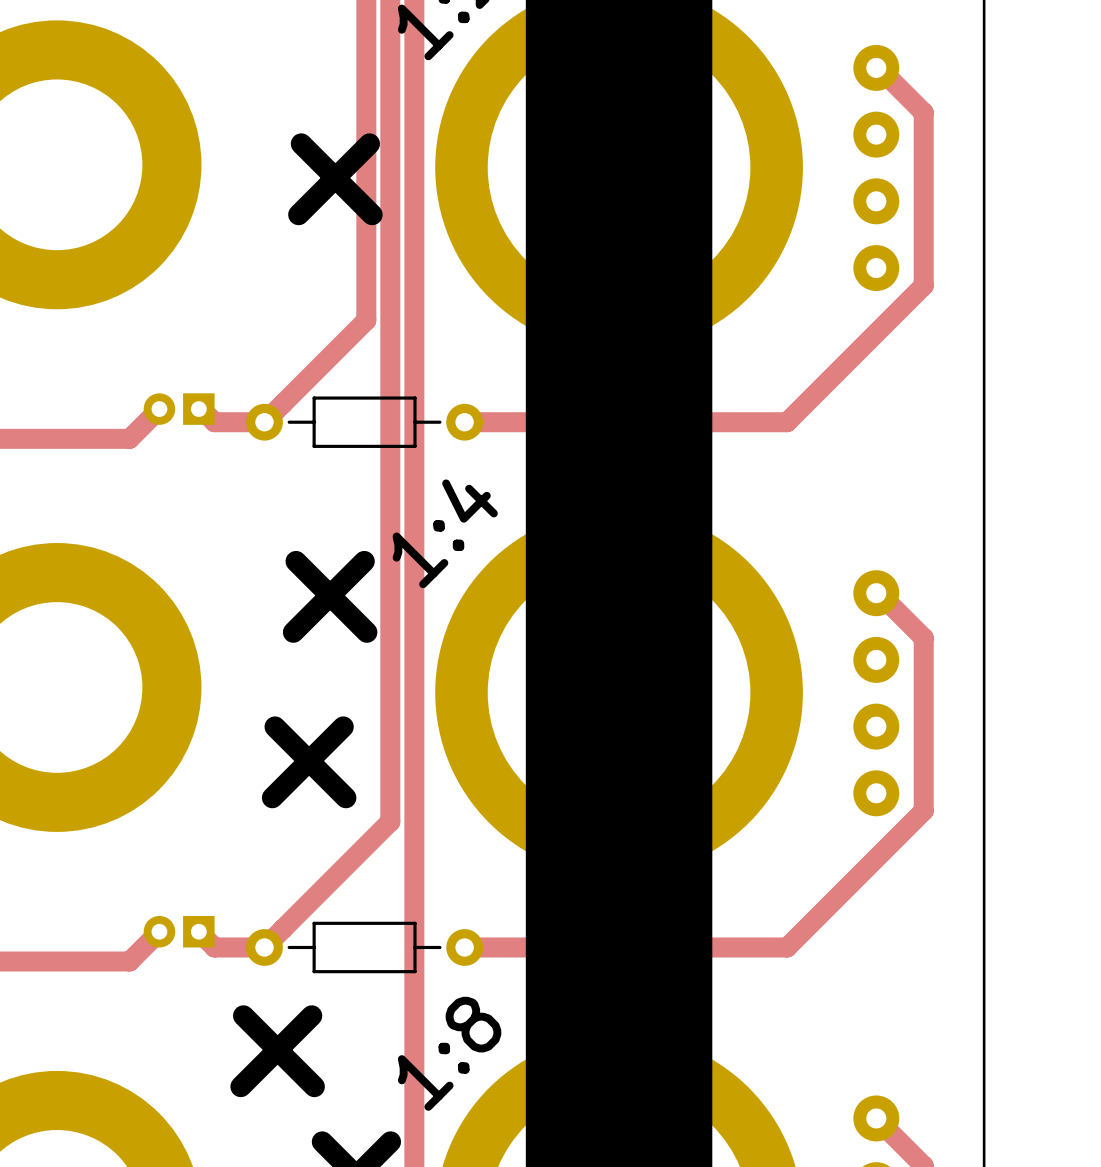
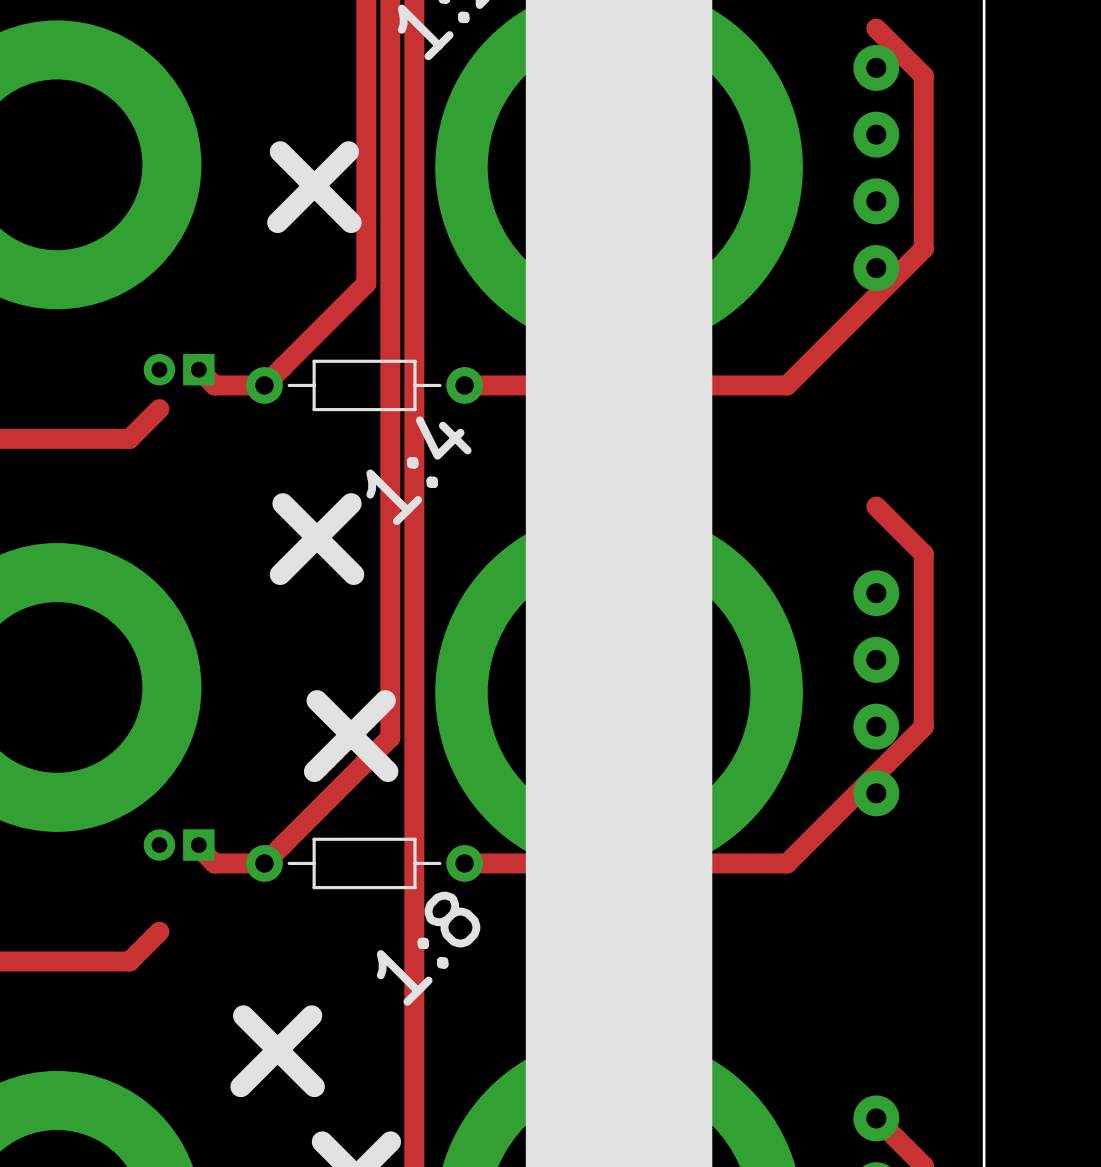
track: (876, 65) (923, 112) -> (876, 28) (923, 75) (923, 112)
line: (301, 143) (372, 214) -> (280, 151) (351, 222)
line: (369, 143) (298, 214) -> (348, 151) (277, 222)
track: (923, 248) (923, 285) (787, 422) (464, 422) -> (923, 248) (787, 385) (464, 385)
track: (366, 283) (366, 320) (264, 422) (214, 422) (198, 406) -> (366, 283) (264, 385) (214, 385) (198, 369)
part position: (179, 409) -> (179, 369)
part position: (364, 422) -> (364, 385)
text position: 1:4 (445, 533) -> 1:4 (418, 470)
line: (296, 561) (366, 632) -> (282, 503) (353, 574)
line: (364, 561) (293, 632) -> (351, 503) (280, 574)
track: (876, 590) (923, 637) -> (876, 506) (923, 553) (923, 637)
line: (275, 726) (345, 797) -> (317, 700) (387, 771)
line: (343, 726) (272, 797) -> (385, 700) (314, 771)
track: (923, 726) (923, 810) (787, 947) (464, 947) -> (923, 726) (787, 863) (464, 863)
track: (390, 737) (390, 821) (264, 947) (214, 947) (198, 931) -> (390, 737) (264, 863) (214, 863) (198, 847)
part position: (179, 931) -> (179, 845)
part position: (364, 947) -> (364, 863)
text position: 1:8 (449, 1053) -> 1:8 (428, 948)

